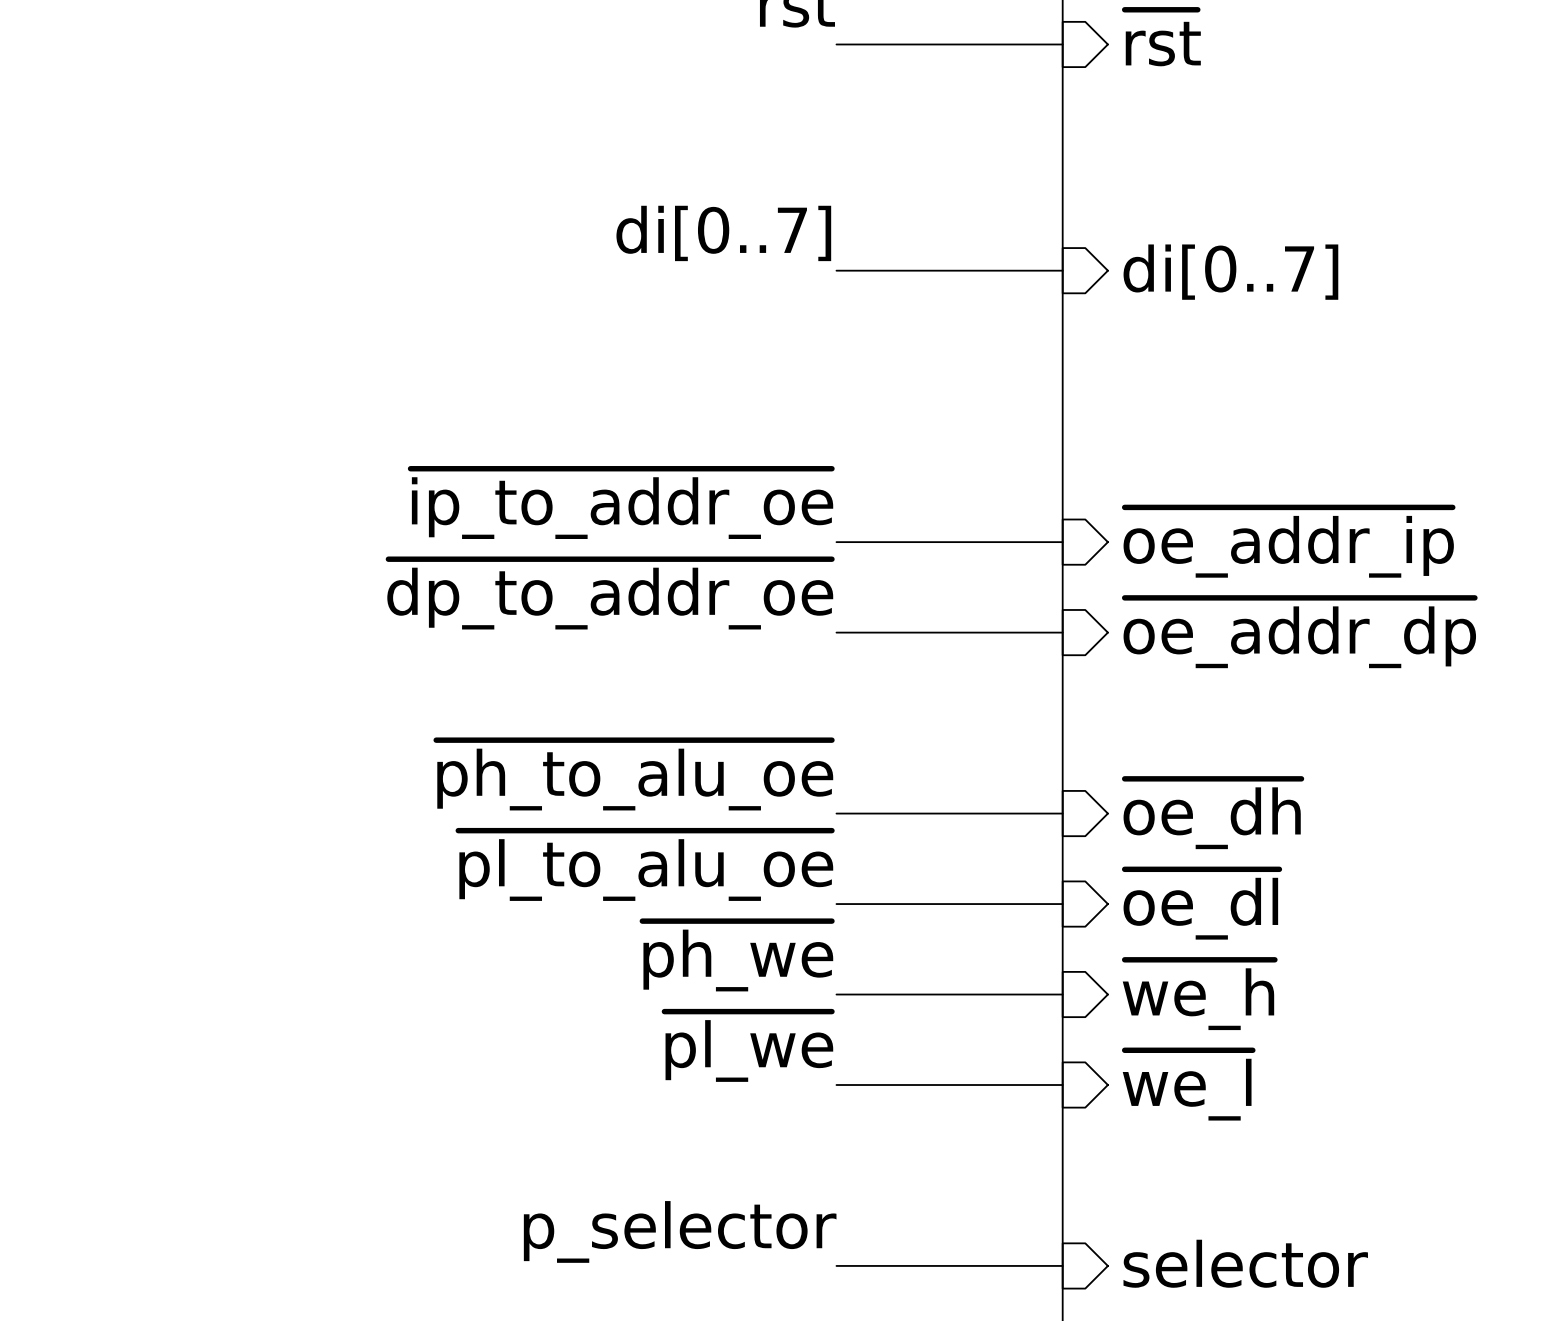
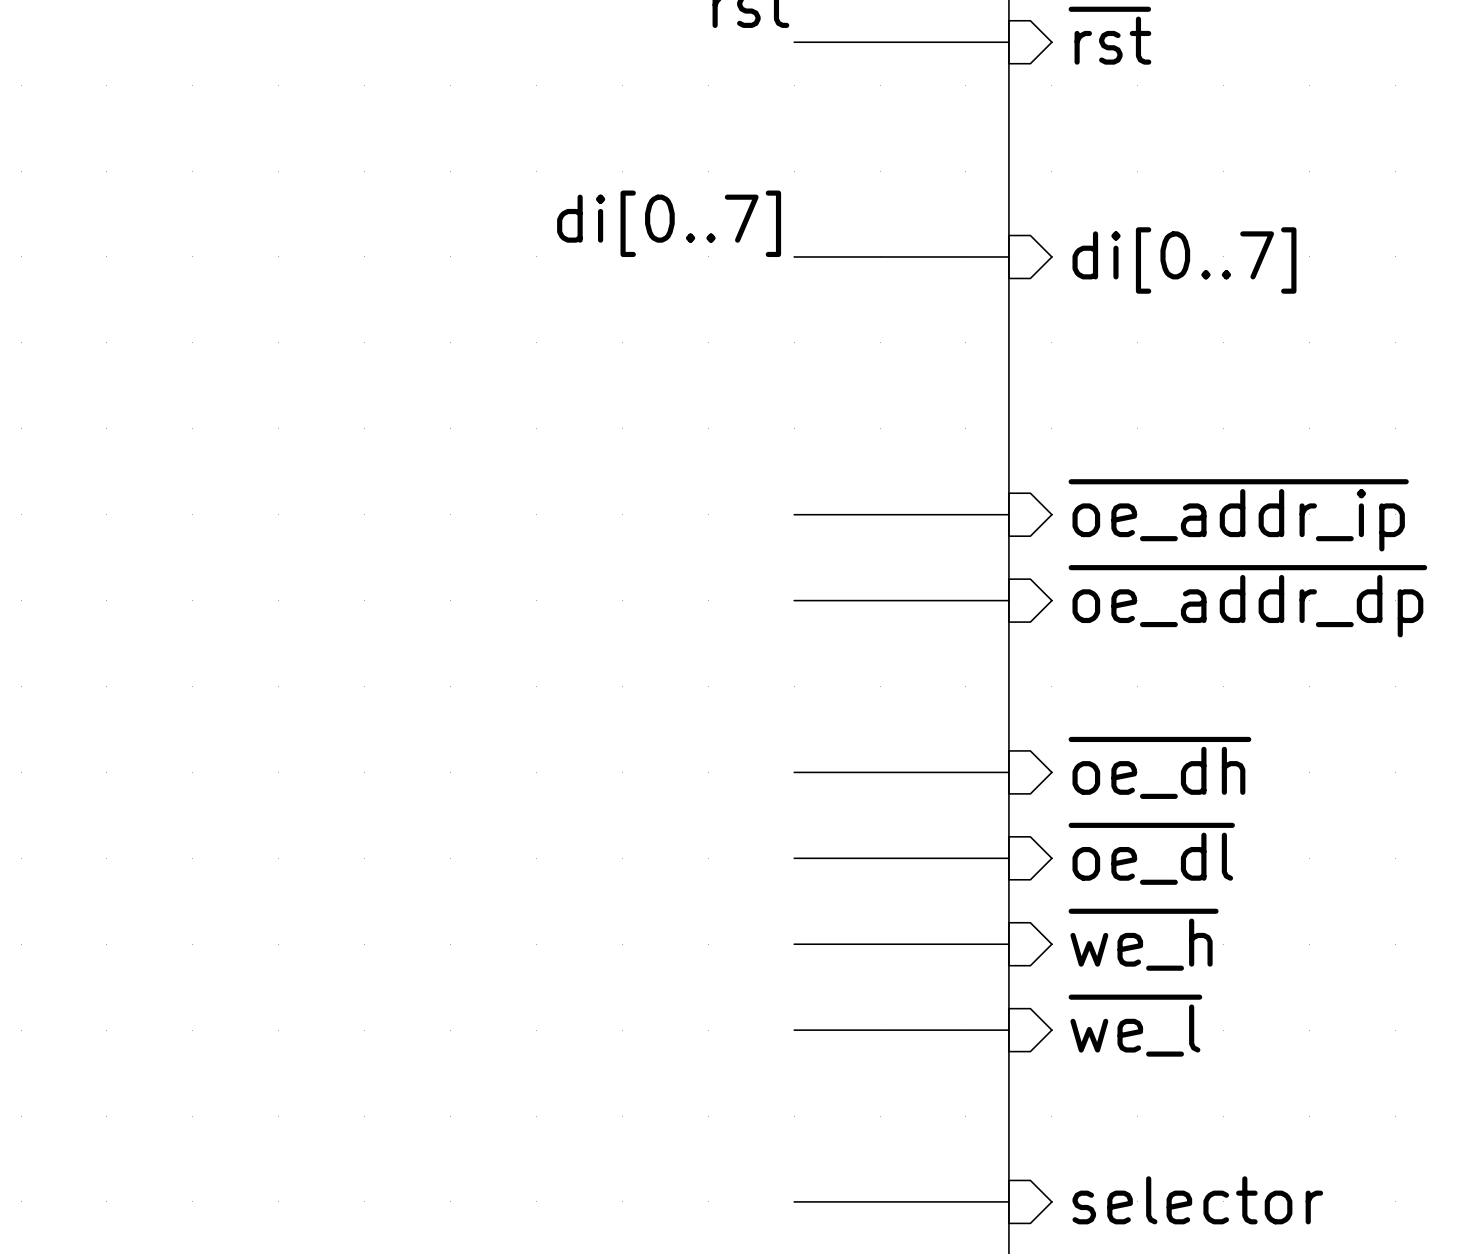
label: ~{ip_to_addr_oe} (621, 503) -> none
label: ~{dp_to_addr_oe} (610, 594) -> none
label: ~{ph_to_alu_oe} (634, 775) -> none
label: ~{pl_to_alu_oe} (645, 865) -> none
label: ~{ph_we} (737, 956) -> none
label: ~{pl_we} (748, 1046) -> none
label: p_selector (680, 1231) -> none

